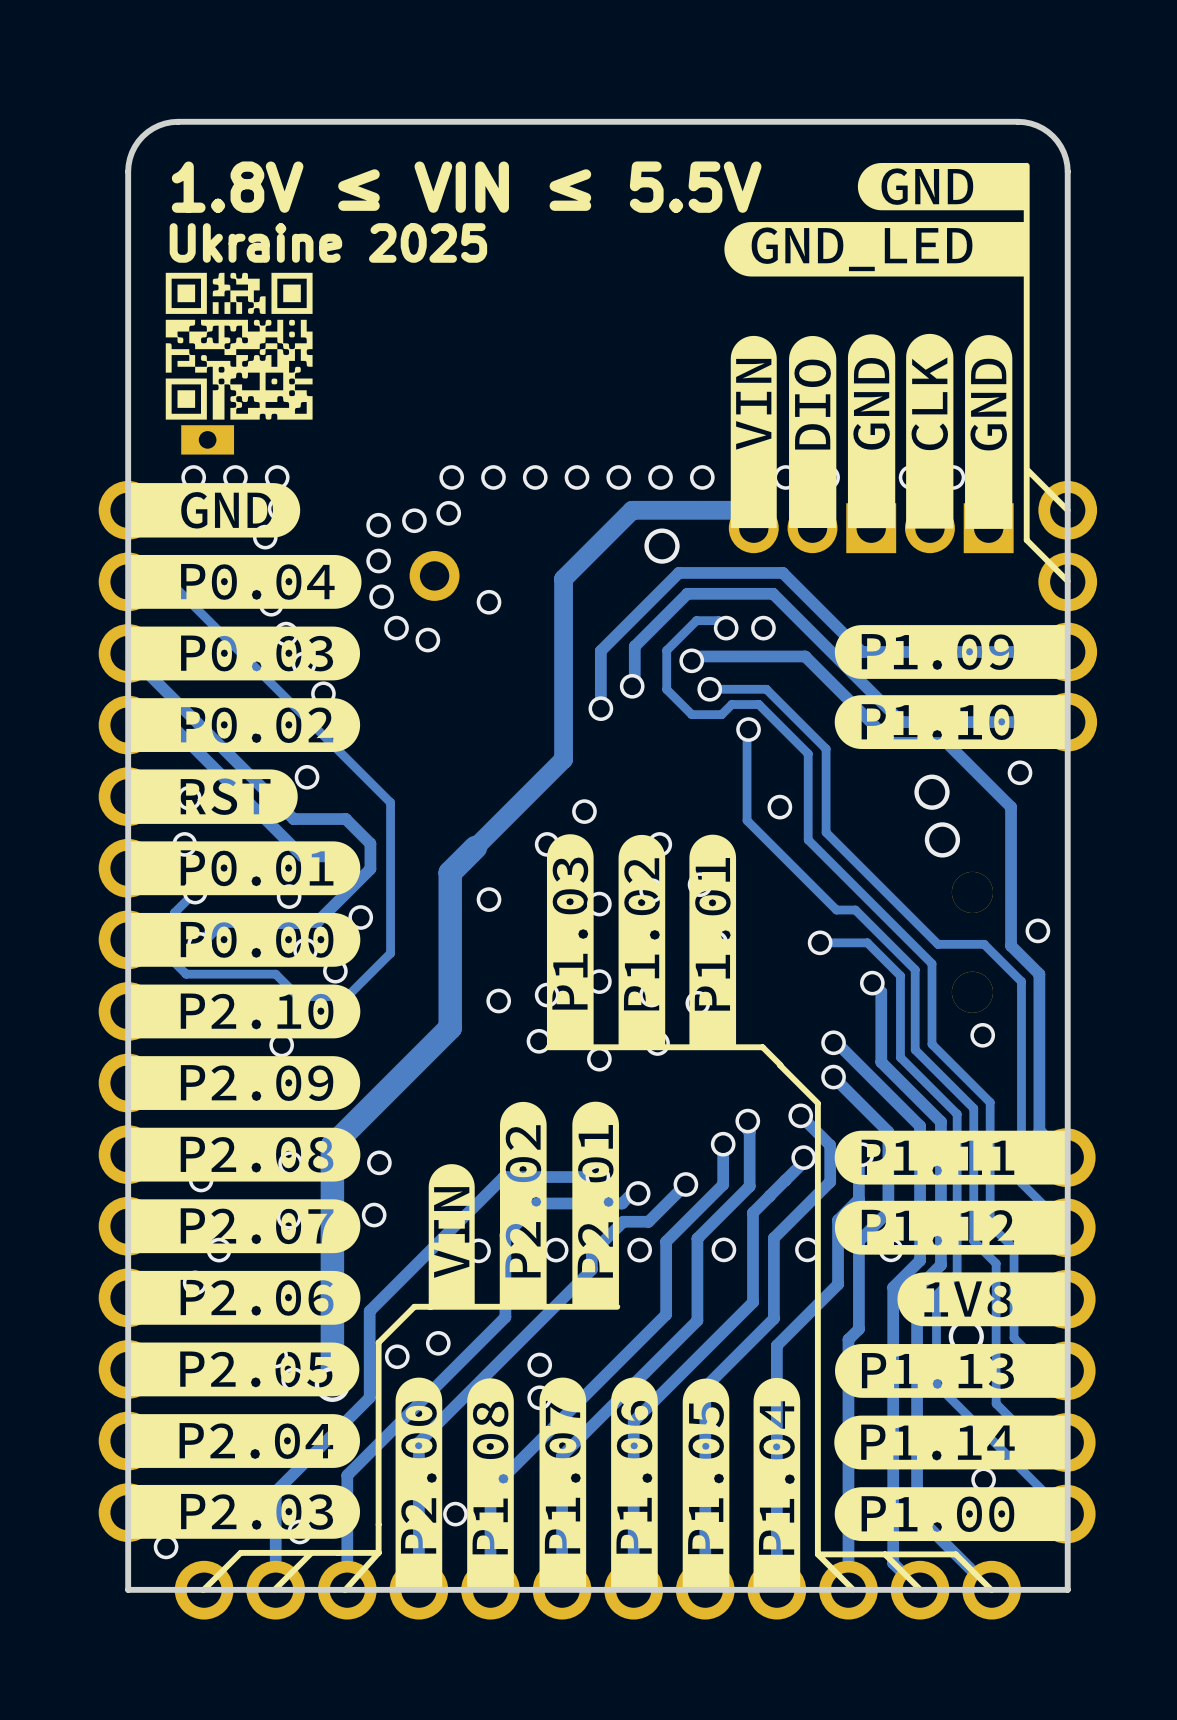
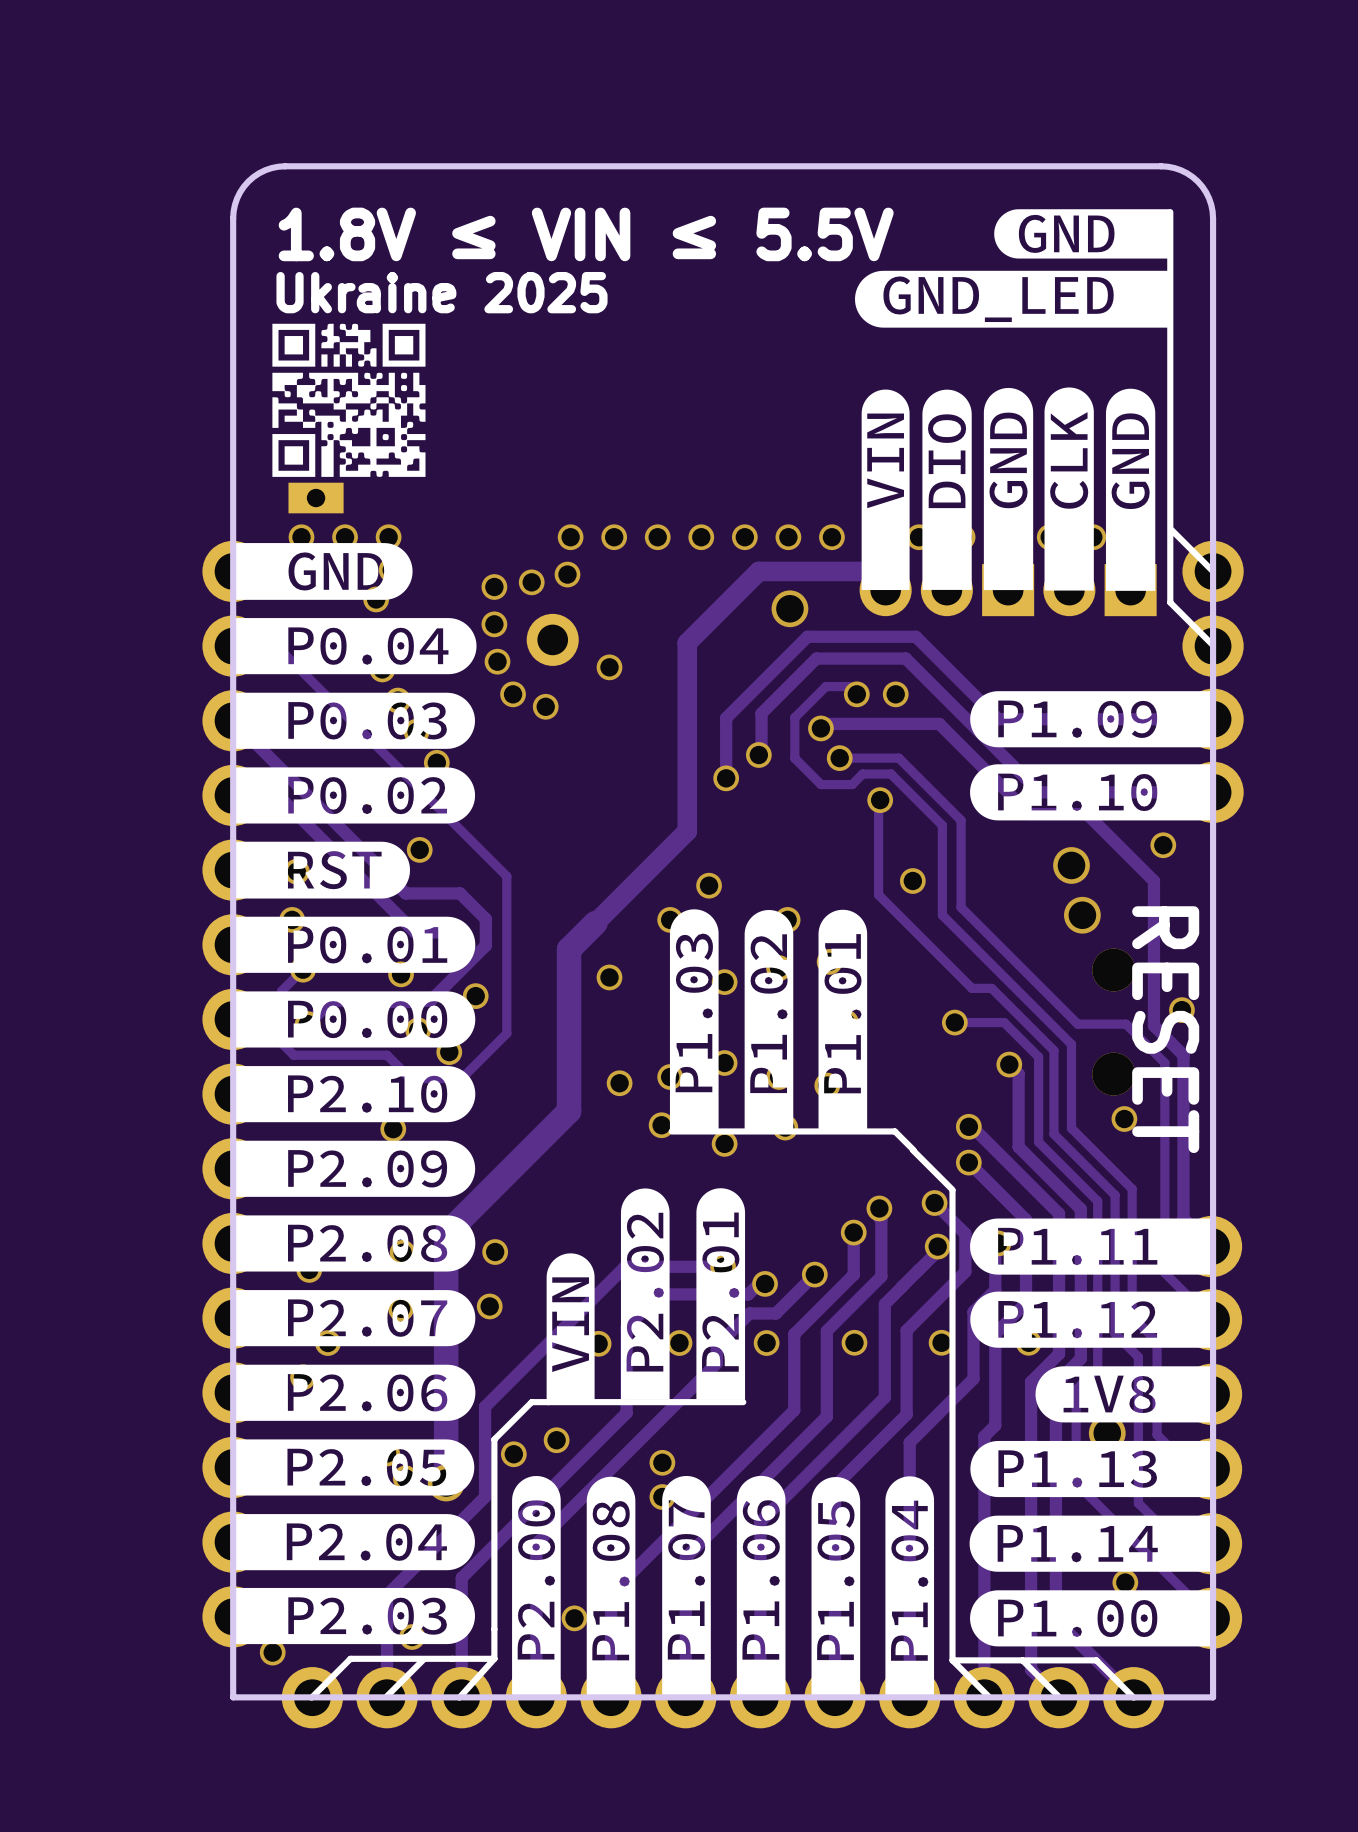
text: none -> RESET (1165, 1029)

